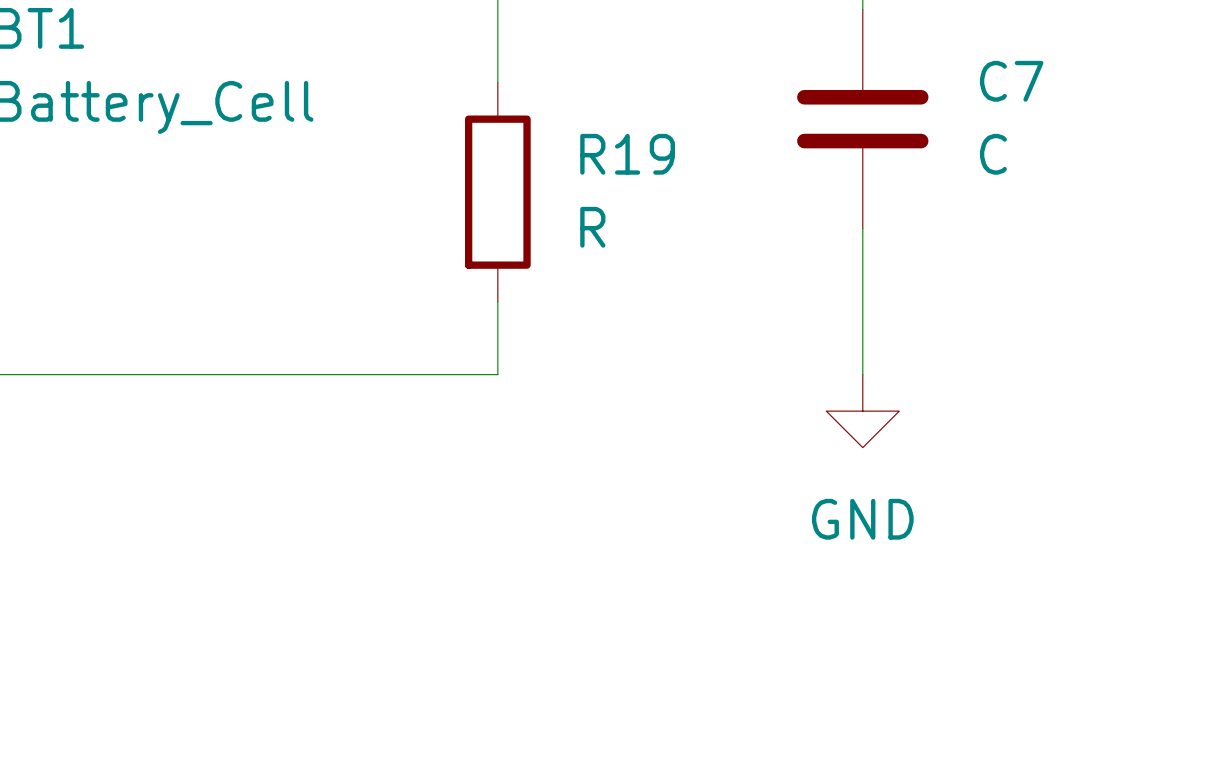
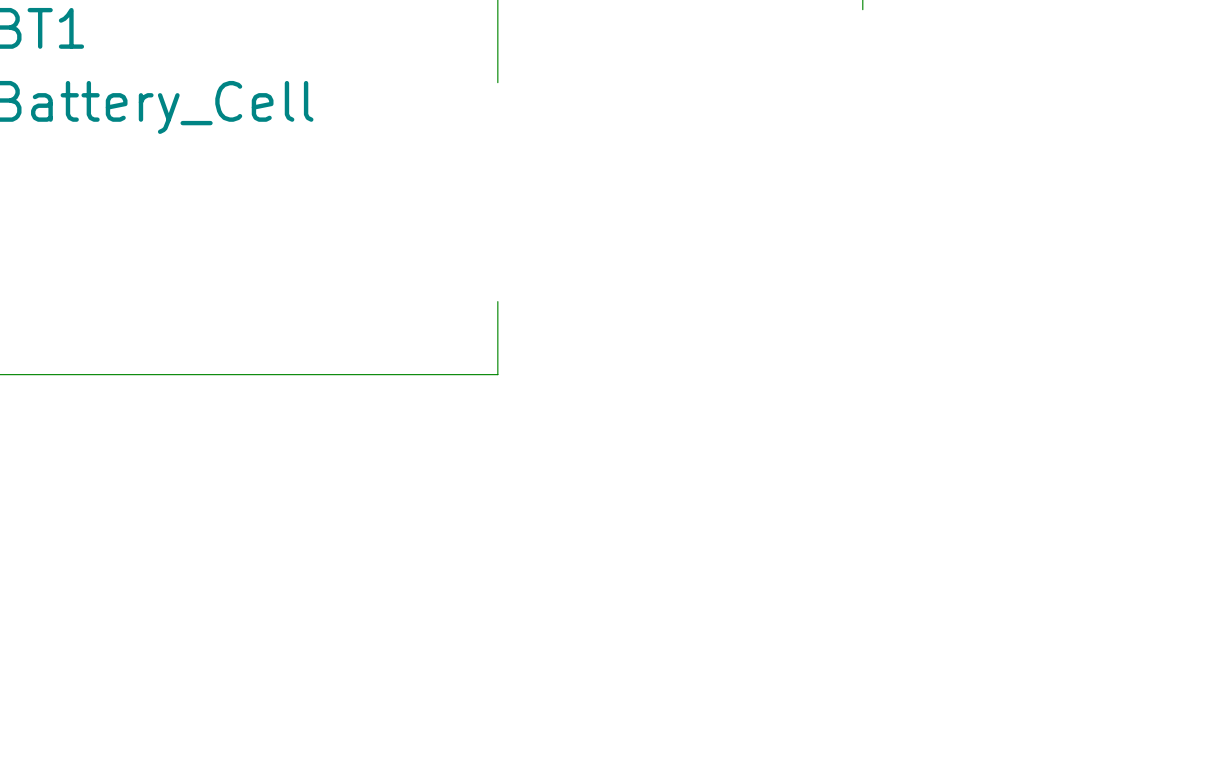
C7: C (862, 119) -> none
R19: R (497, 192) -> none
wire: (862, 228) (862, 374) -> none
power symbol: GND (862, 411) -> none

